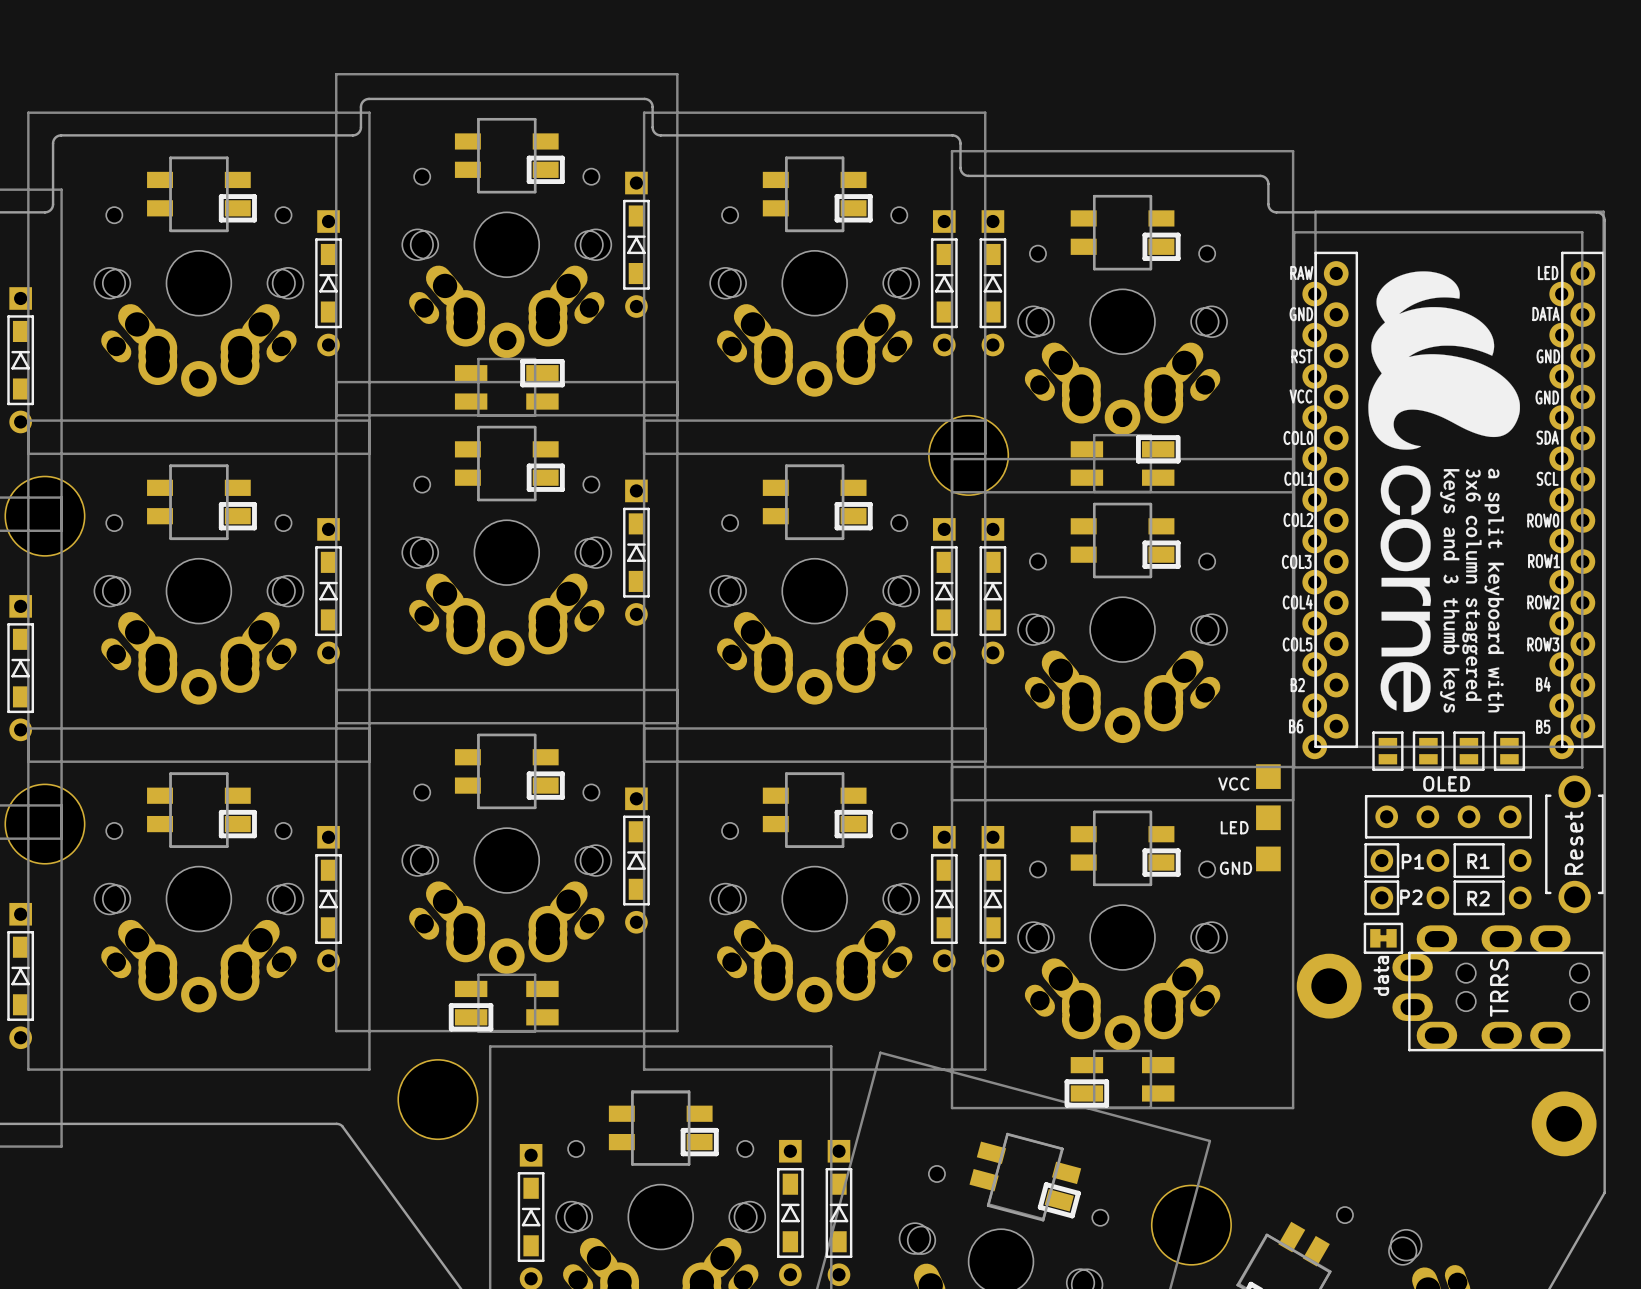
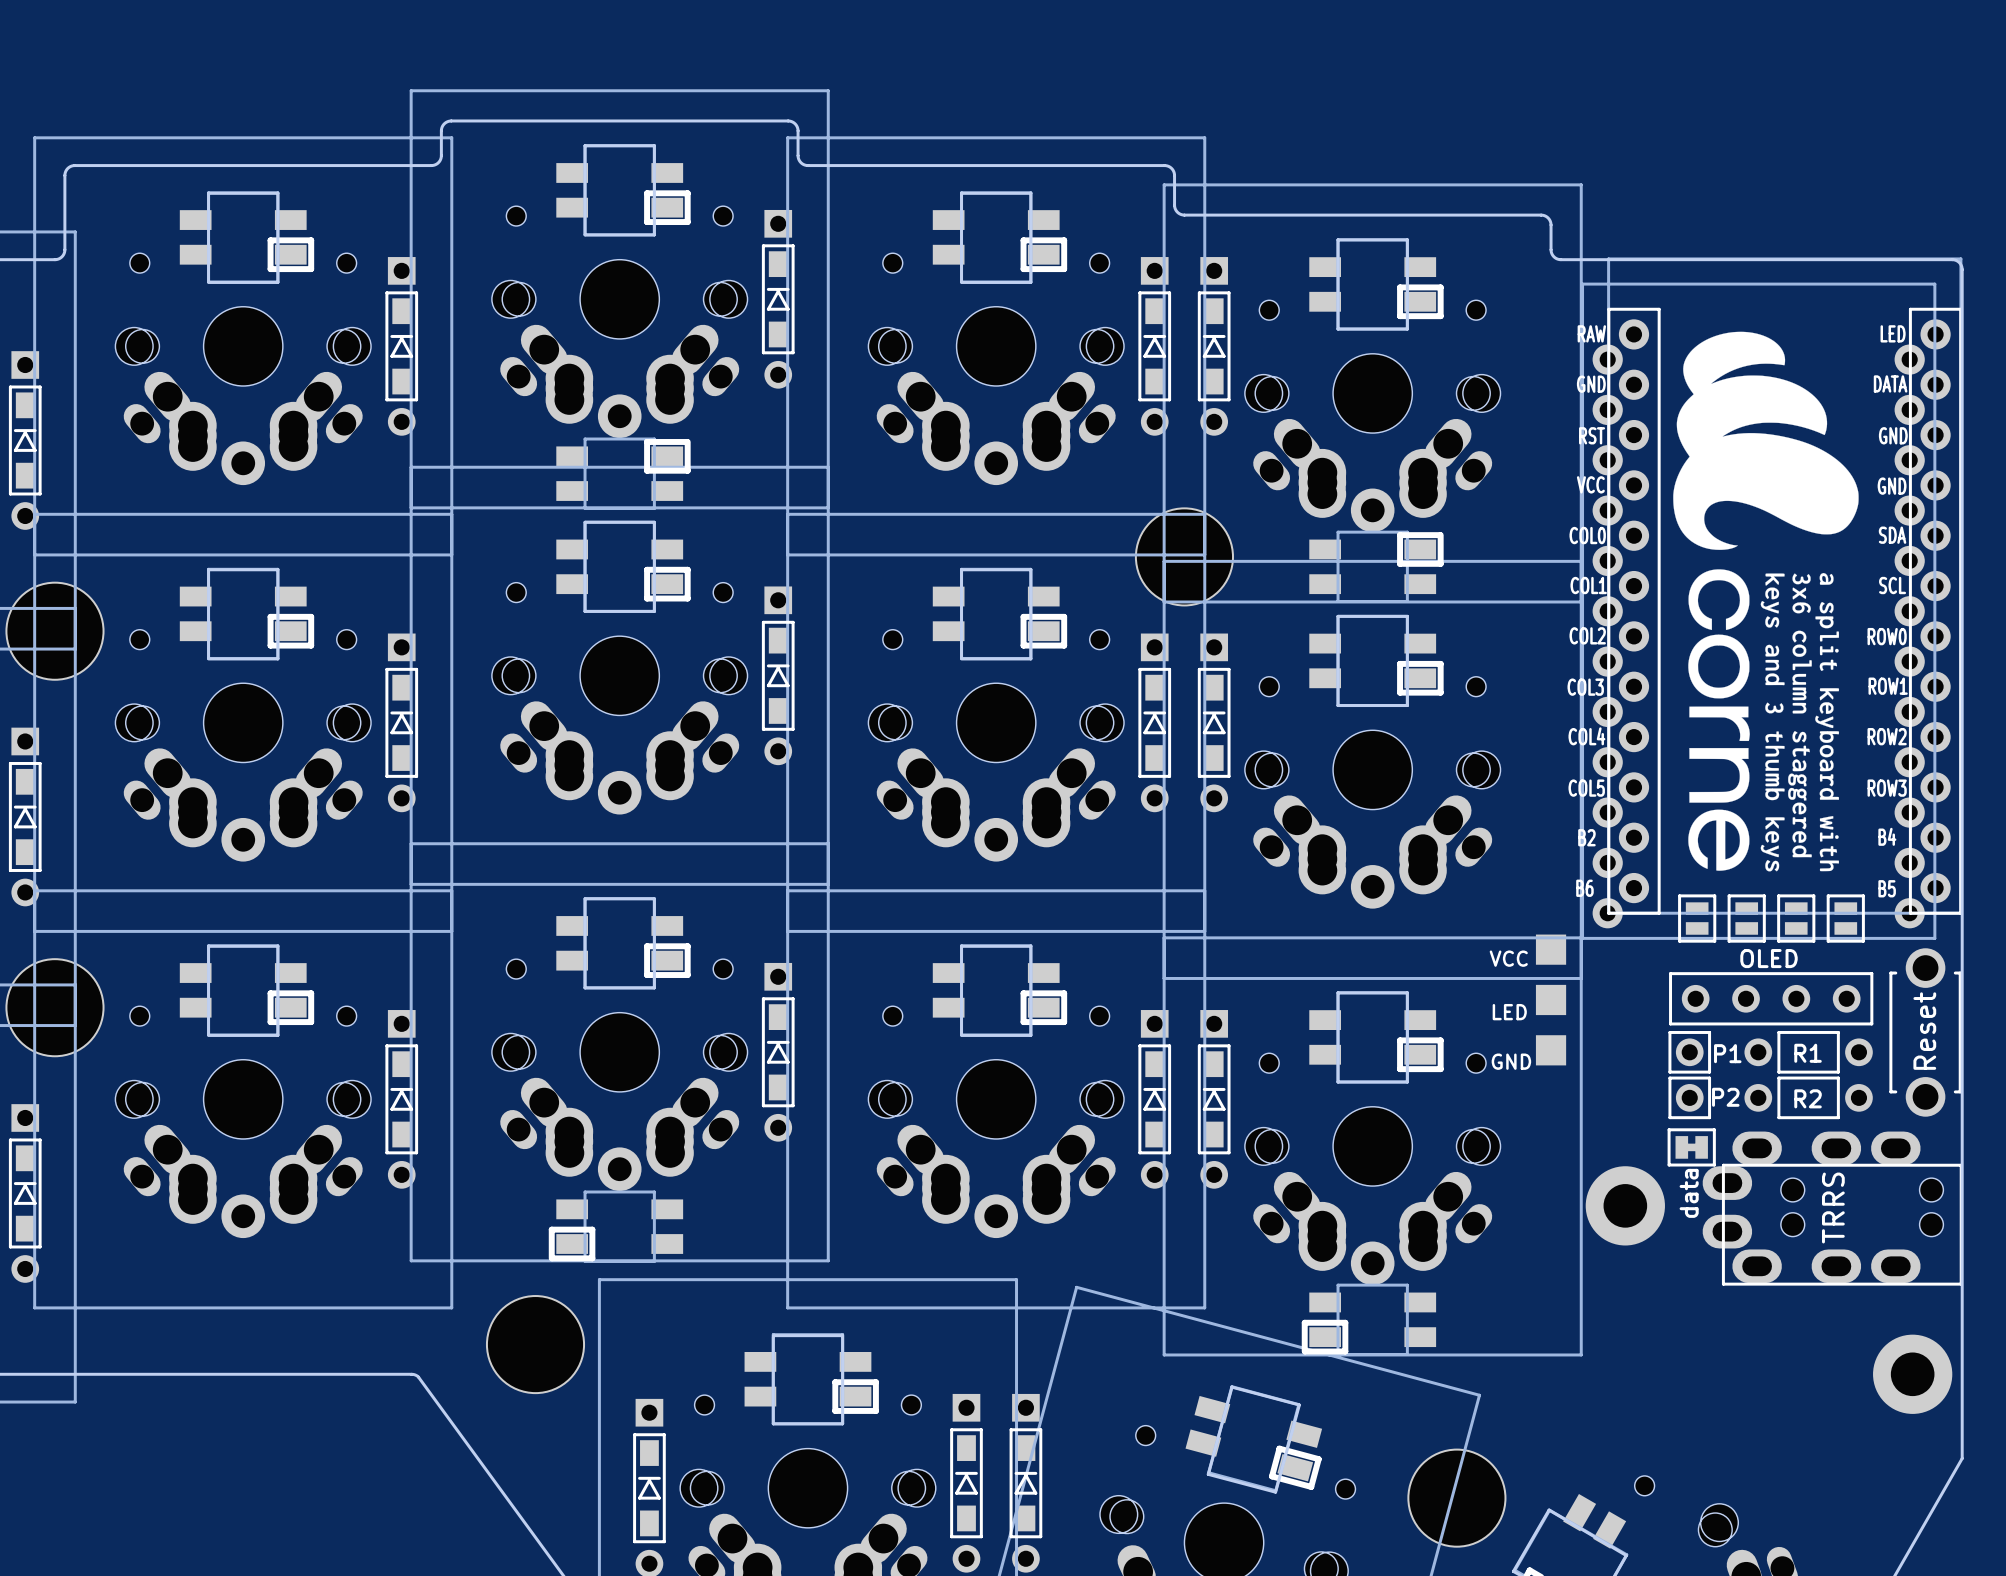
part footprint: [454, 357, 565, 417] -> [556, 437, 691, 510]
part footprint: [1070, 433, 1181, 494] -> [1309, 530, 1444, 603]
part footprint: [448, 973, 559, 1033] -> [548, 1190, 684, 1263]
part footprint: [1064, 1049, 1175, 1109] -> [1301, 1283, 1437, 1356]

